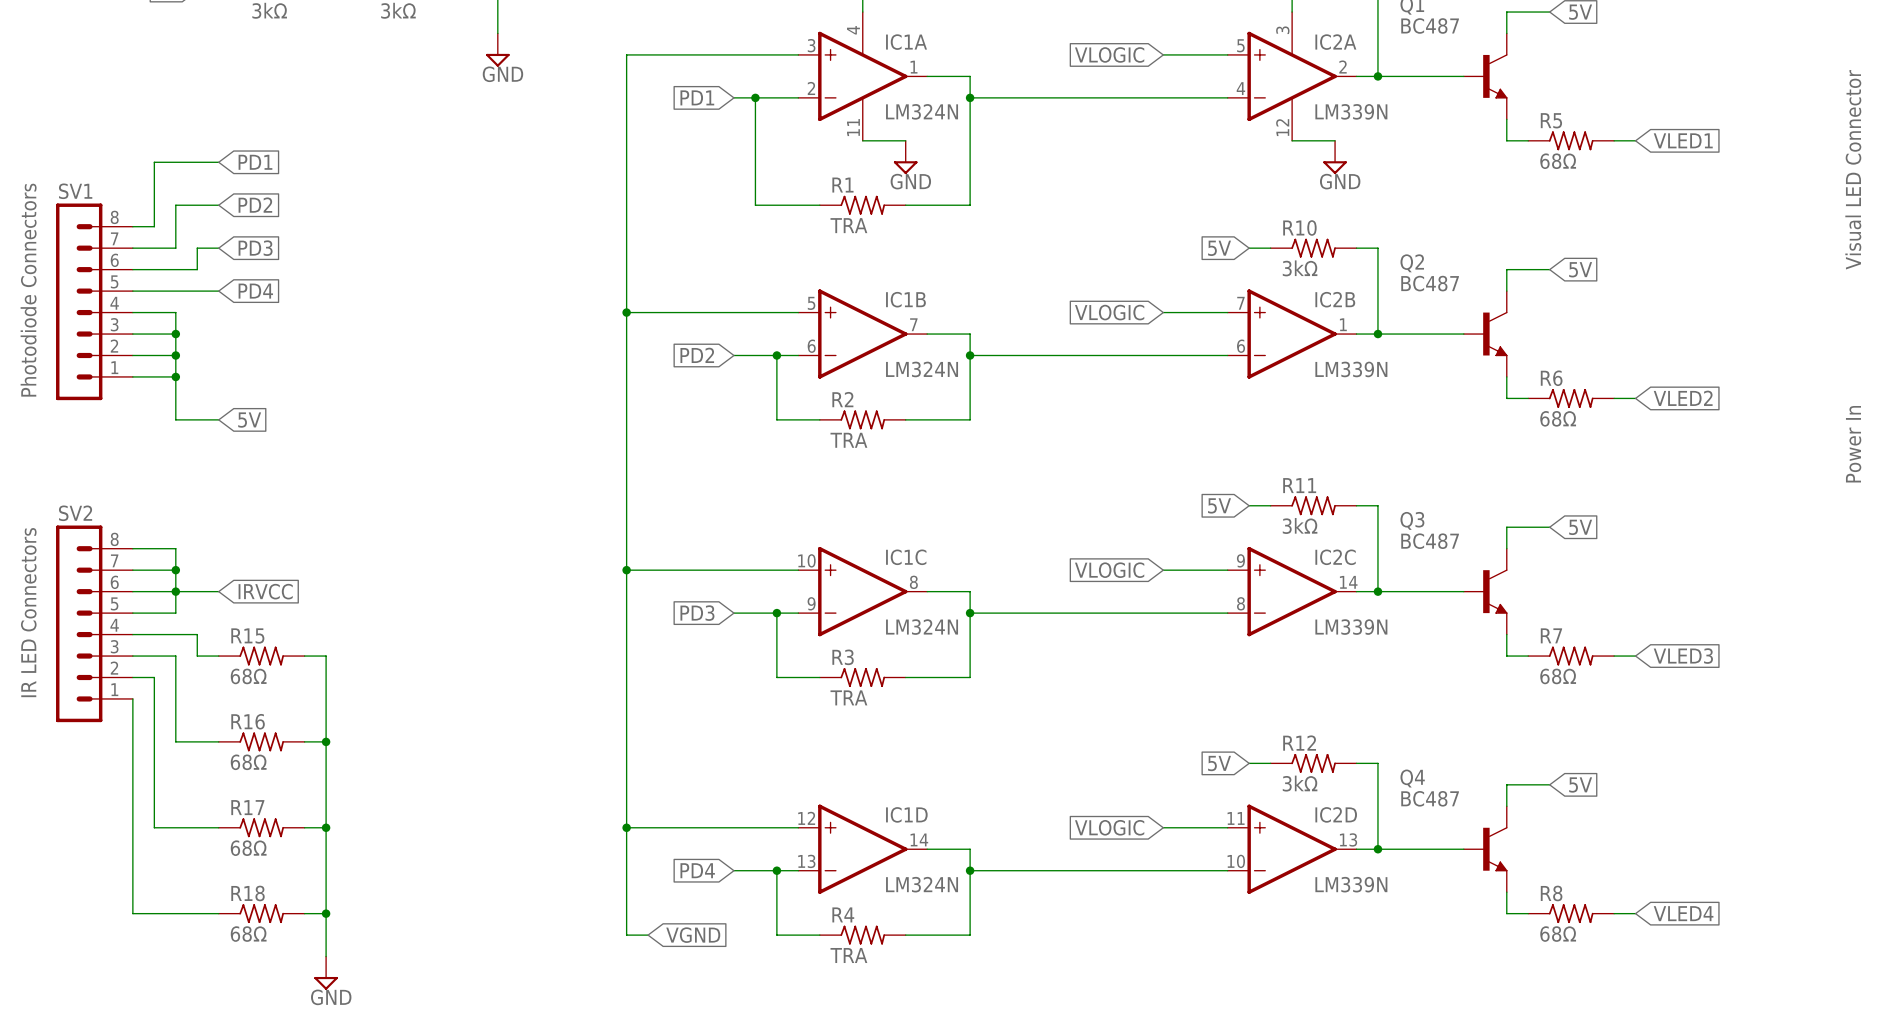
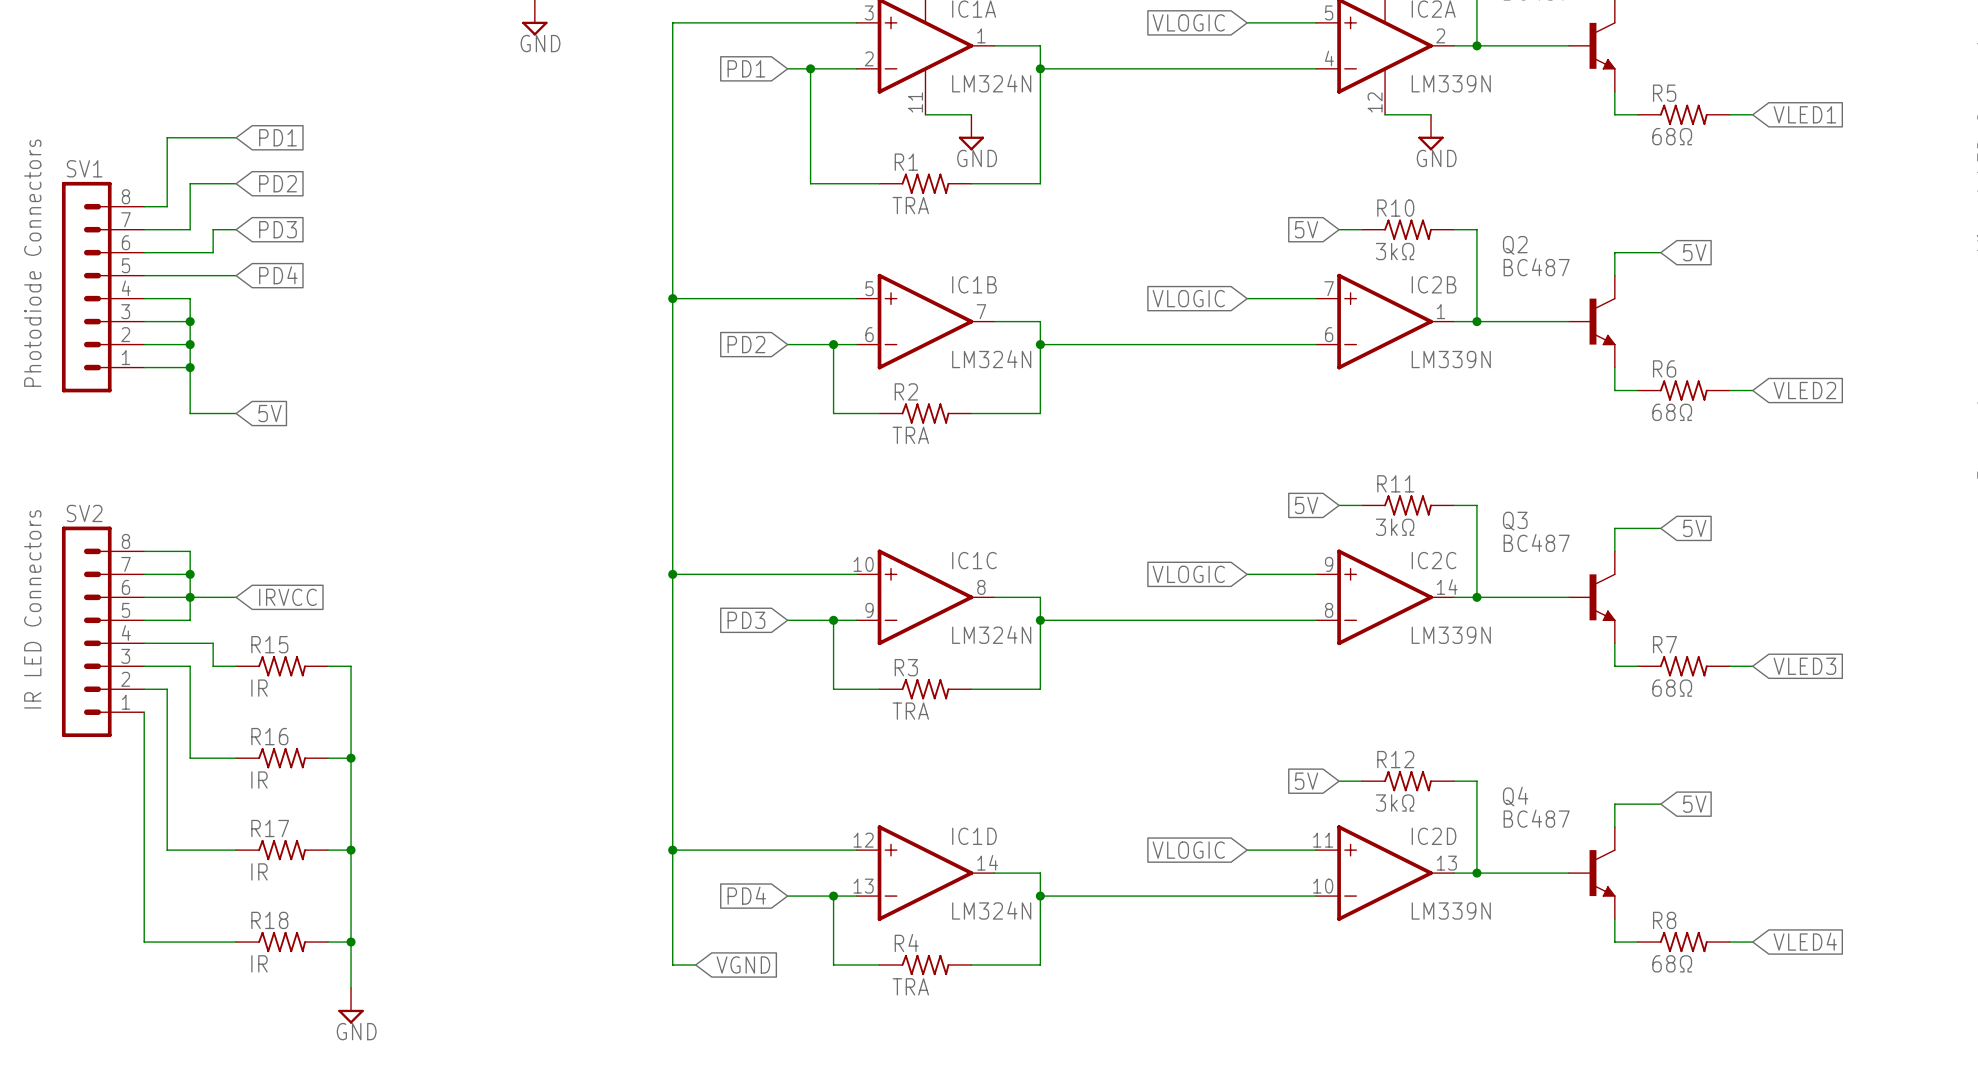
R15 value: 68Ω (248, 676) -> IR (259, 688)
R16 value: 68Ω (248, 762) -> IR (259, 780)
R17 value: 68Ω (248, 848) -> IR (259, 871)
R18 value: 68Ω (248, 934) -> IR (259, 963)

